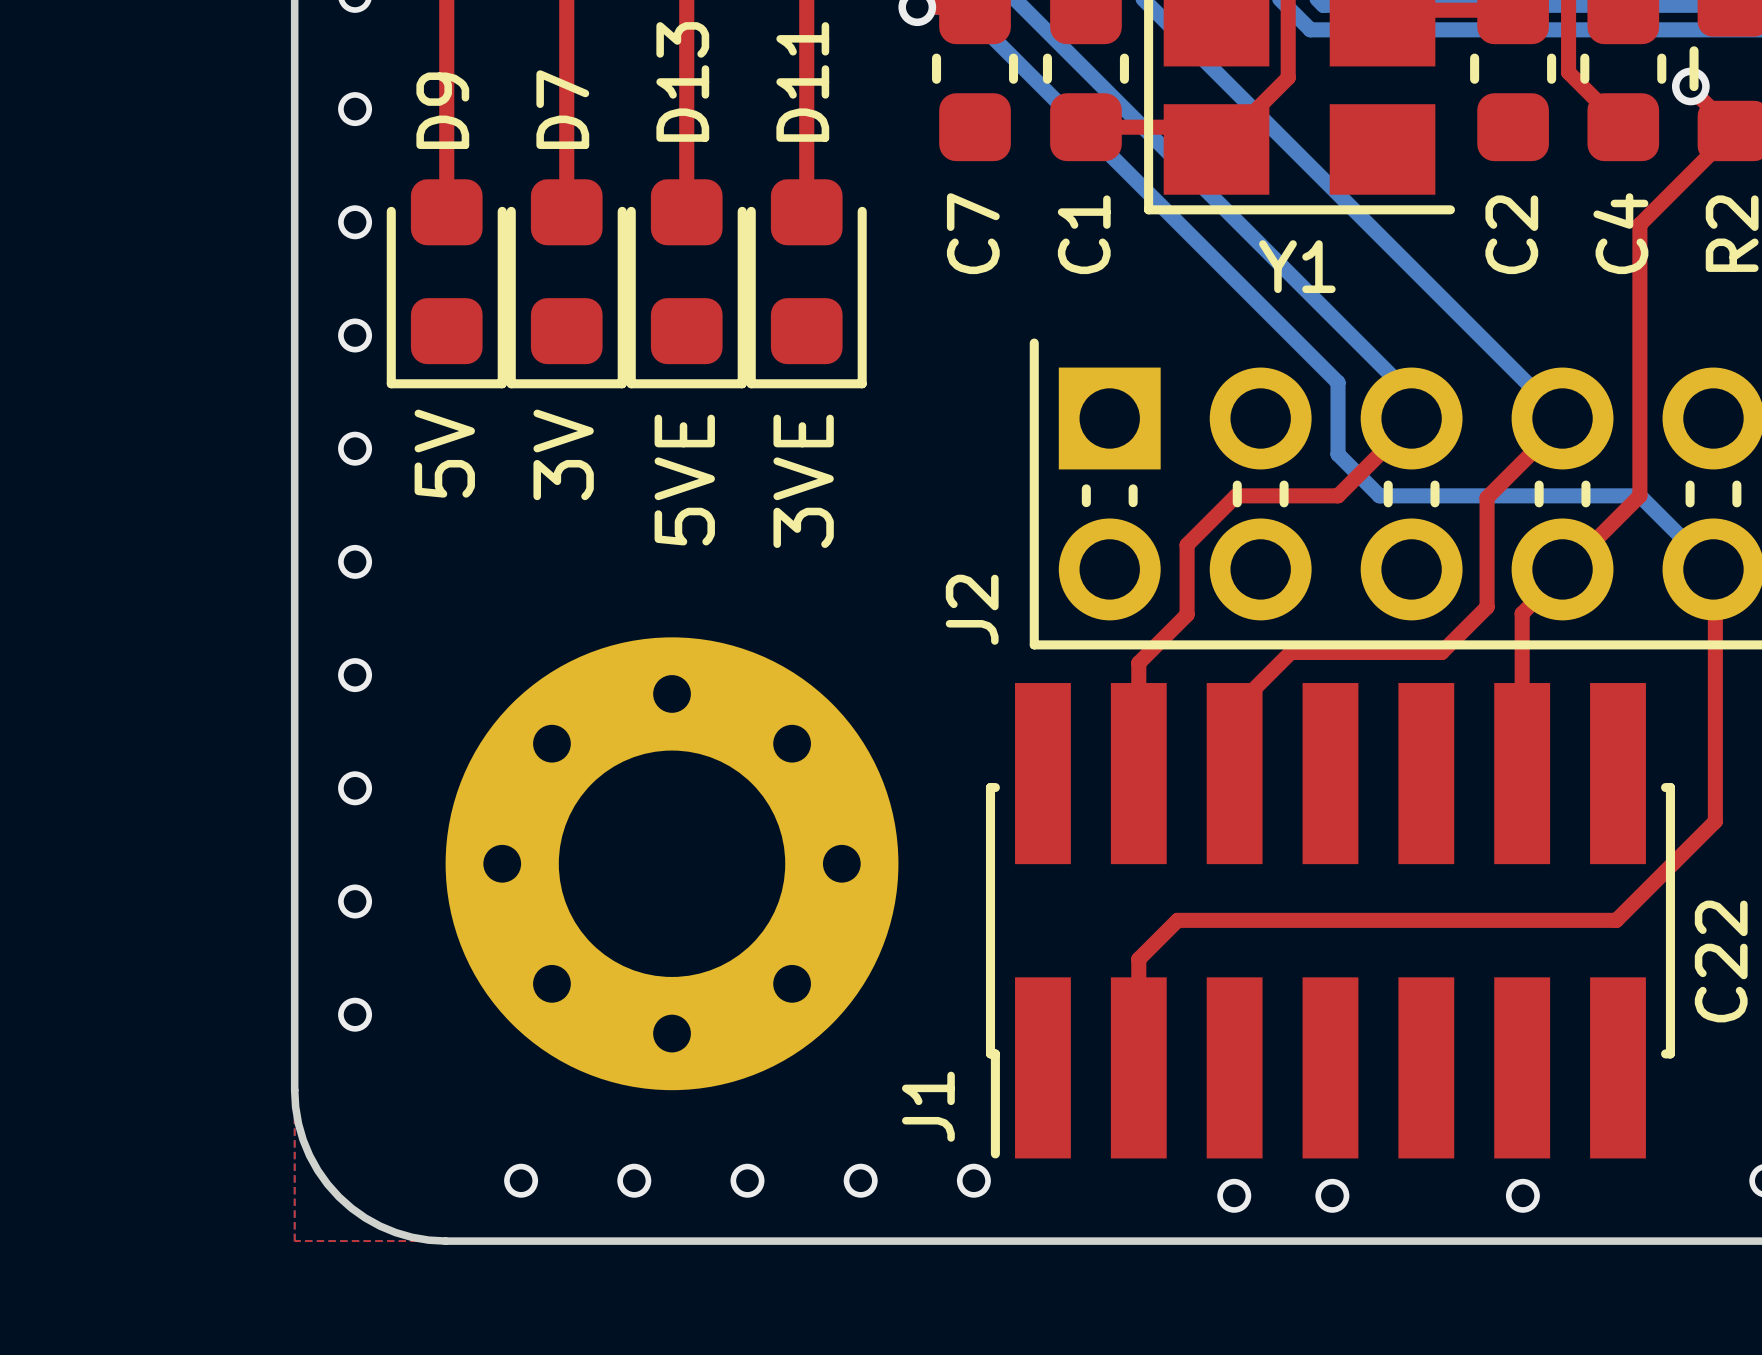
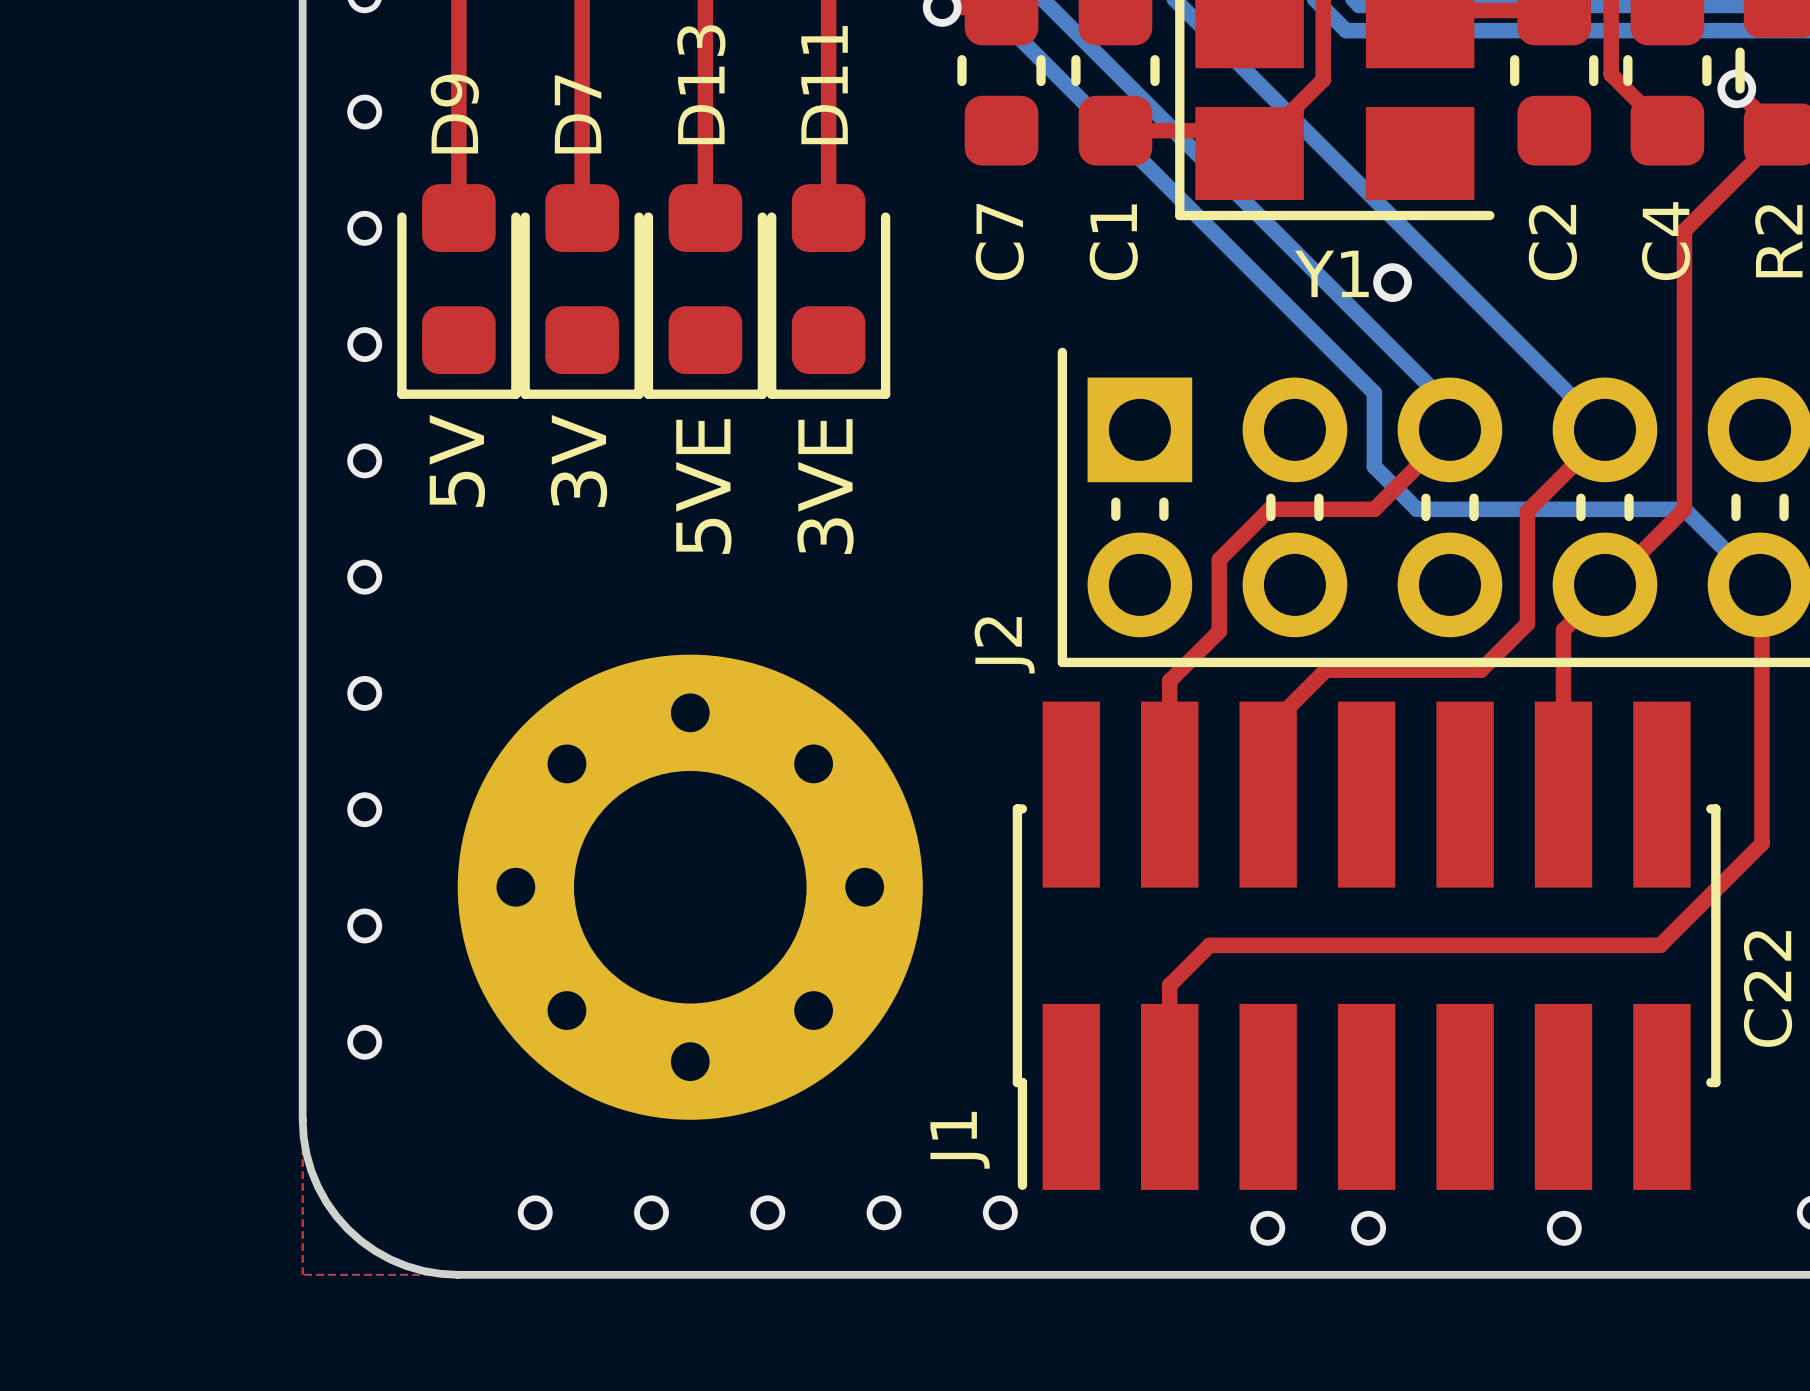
via: none -> (1392, 282)

